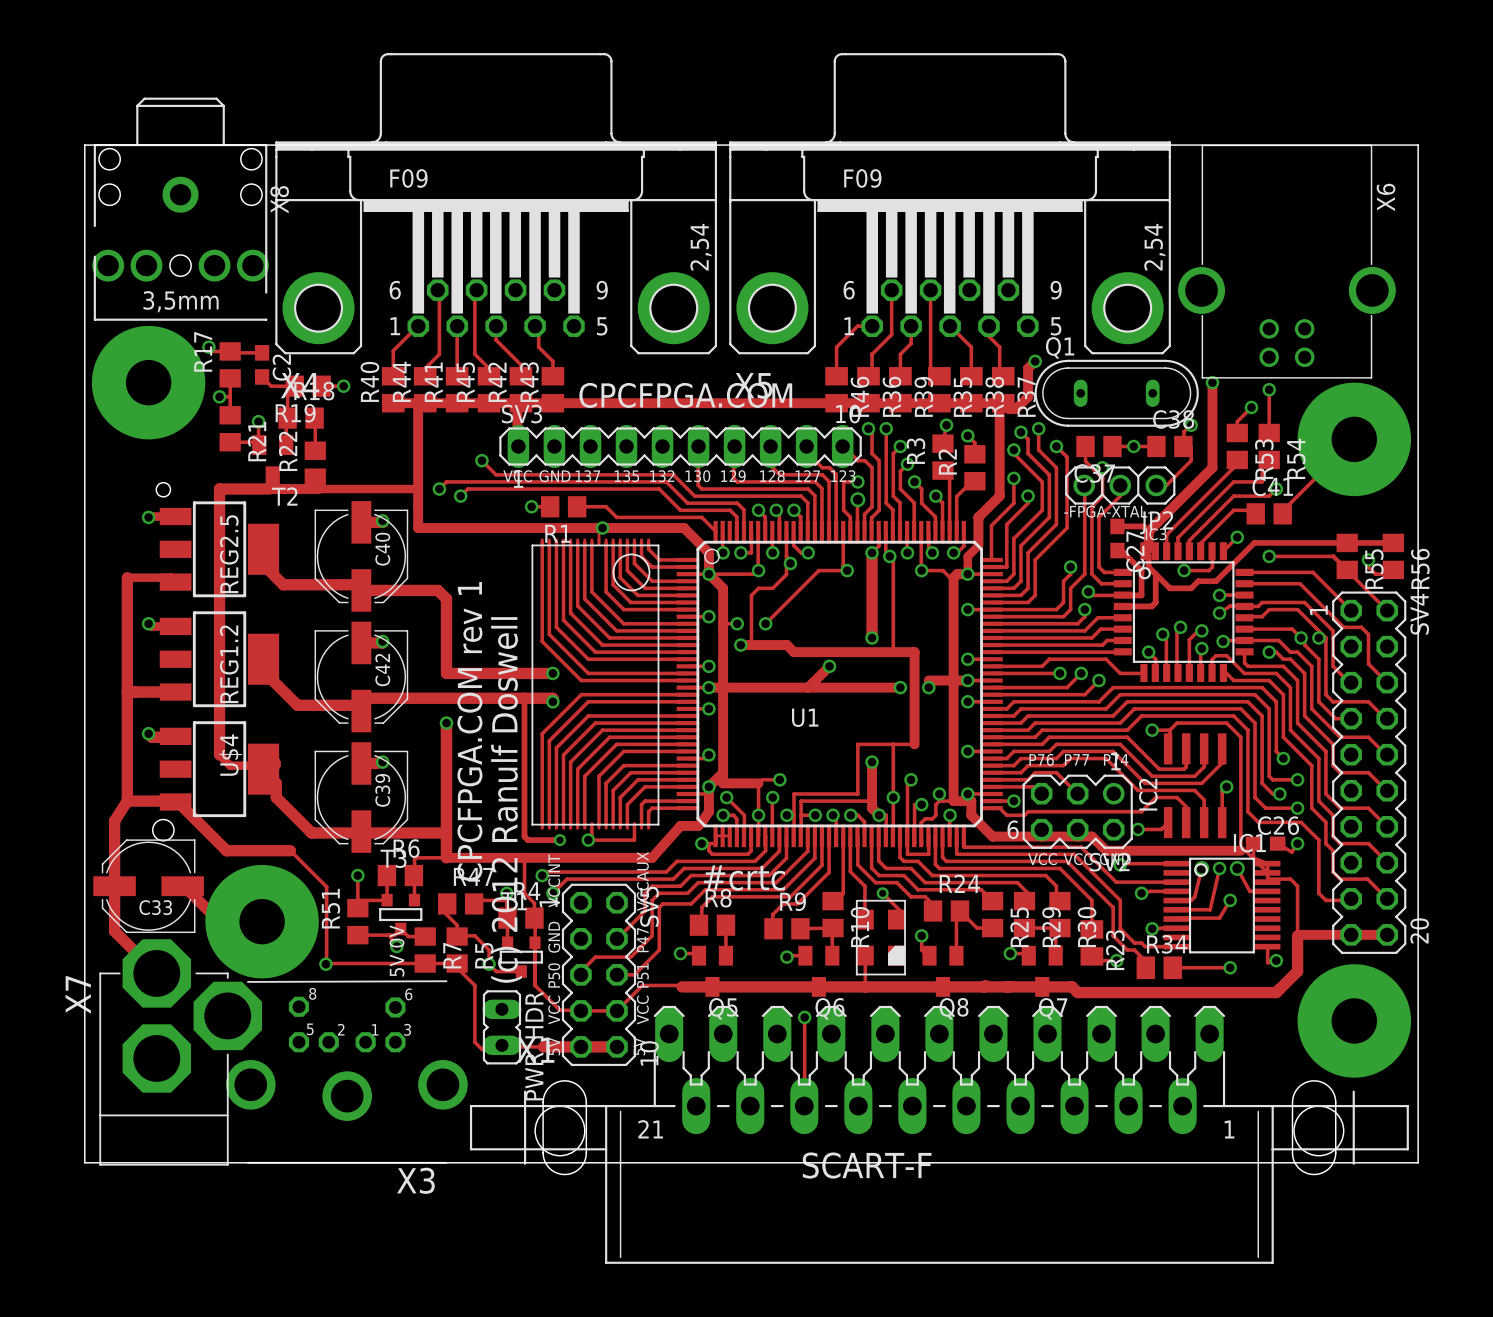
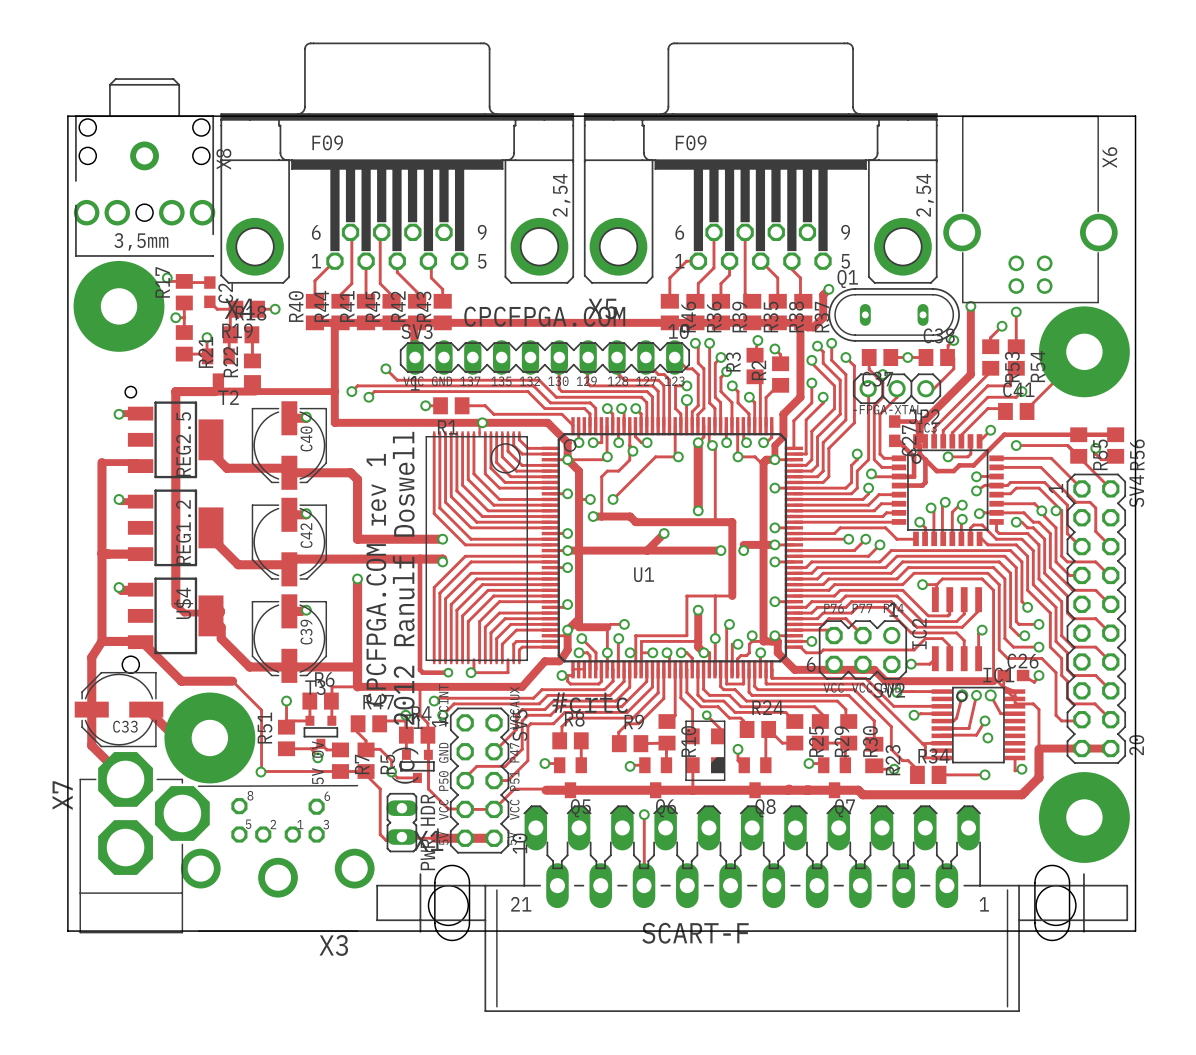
track: (1074, 854) (1120, 900) (1120, 928) (1134, 942) (1141, 942) (1145, 946) (1173, 946) -> (860, 684) (862, 684) (925, 746) (925, 757) (939, 757)
via position: (1152, 928) -> (987, 737)

